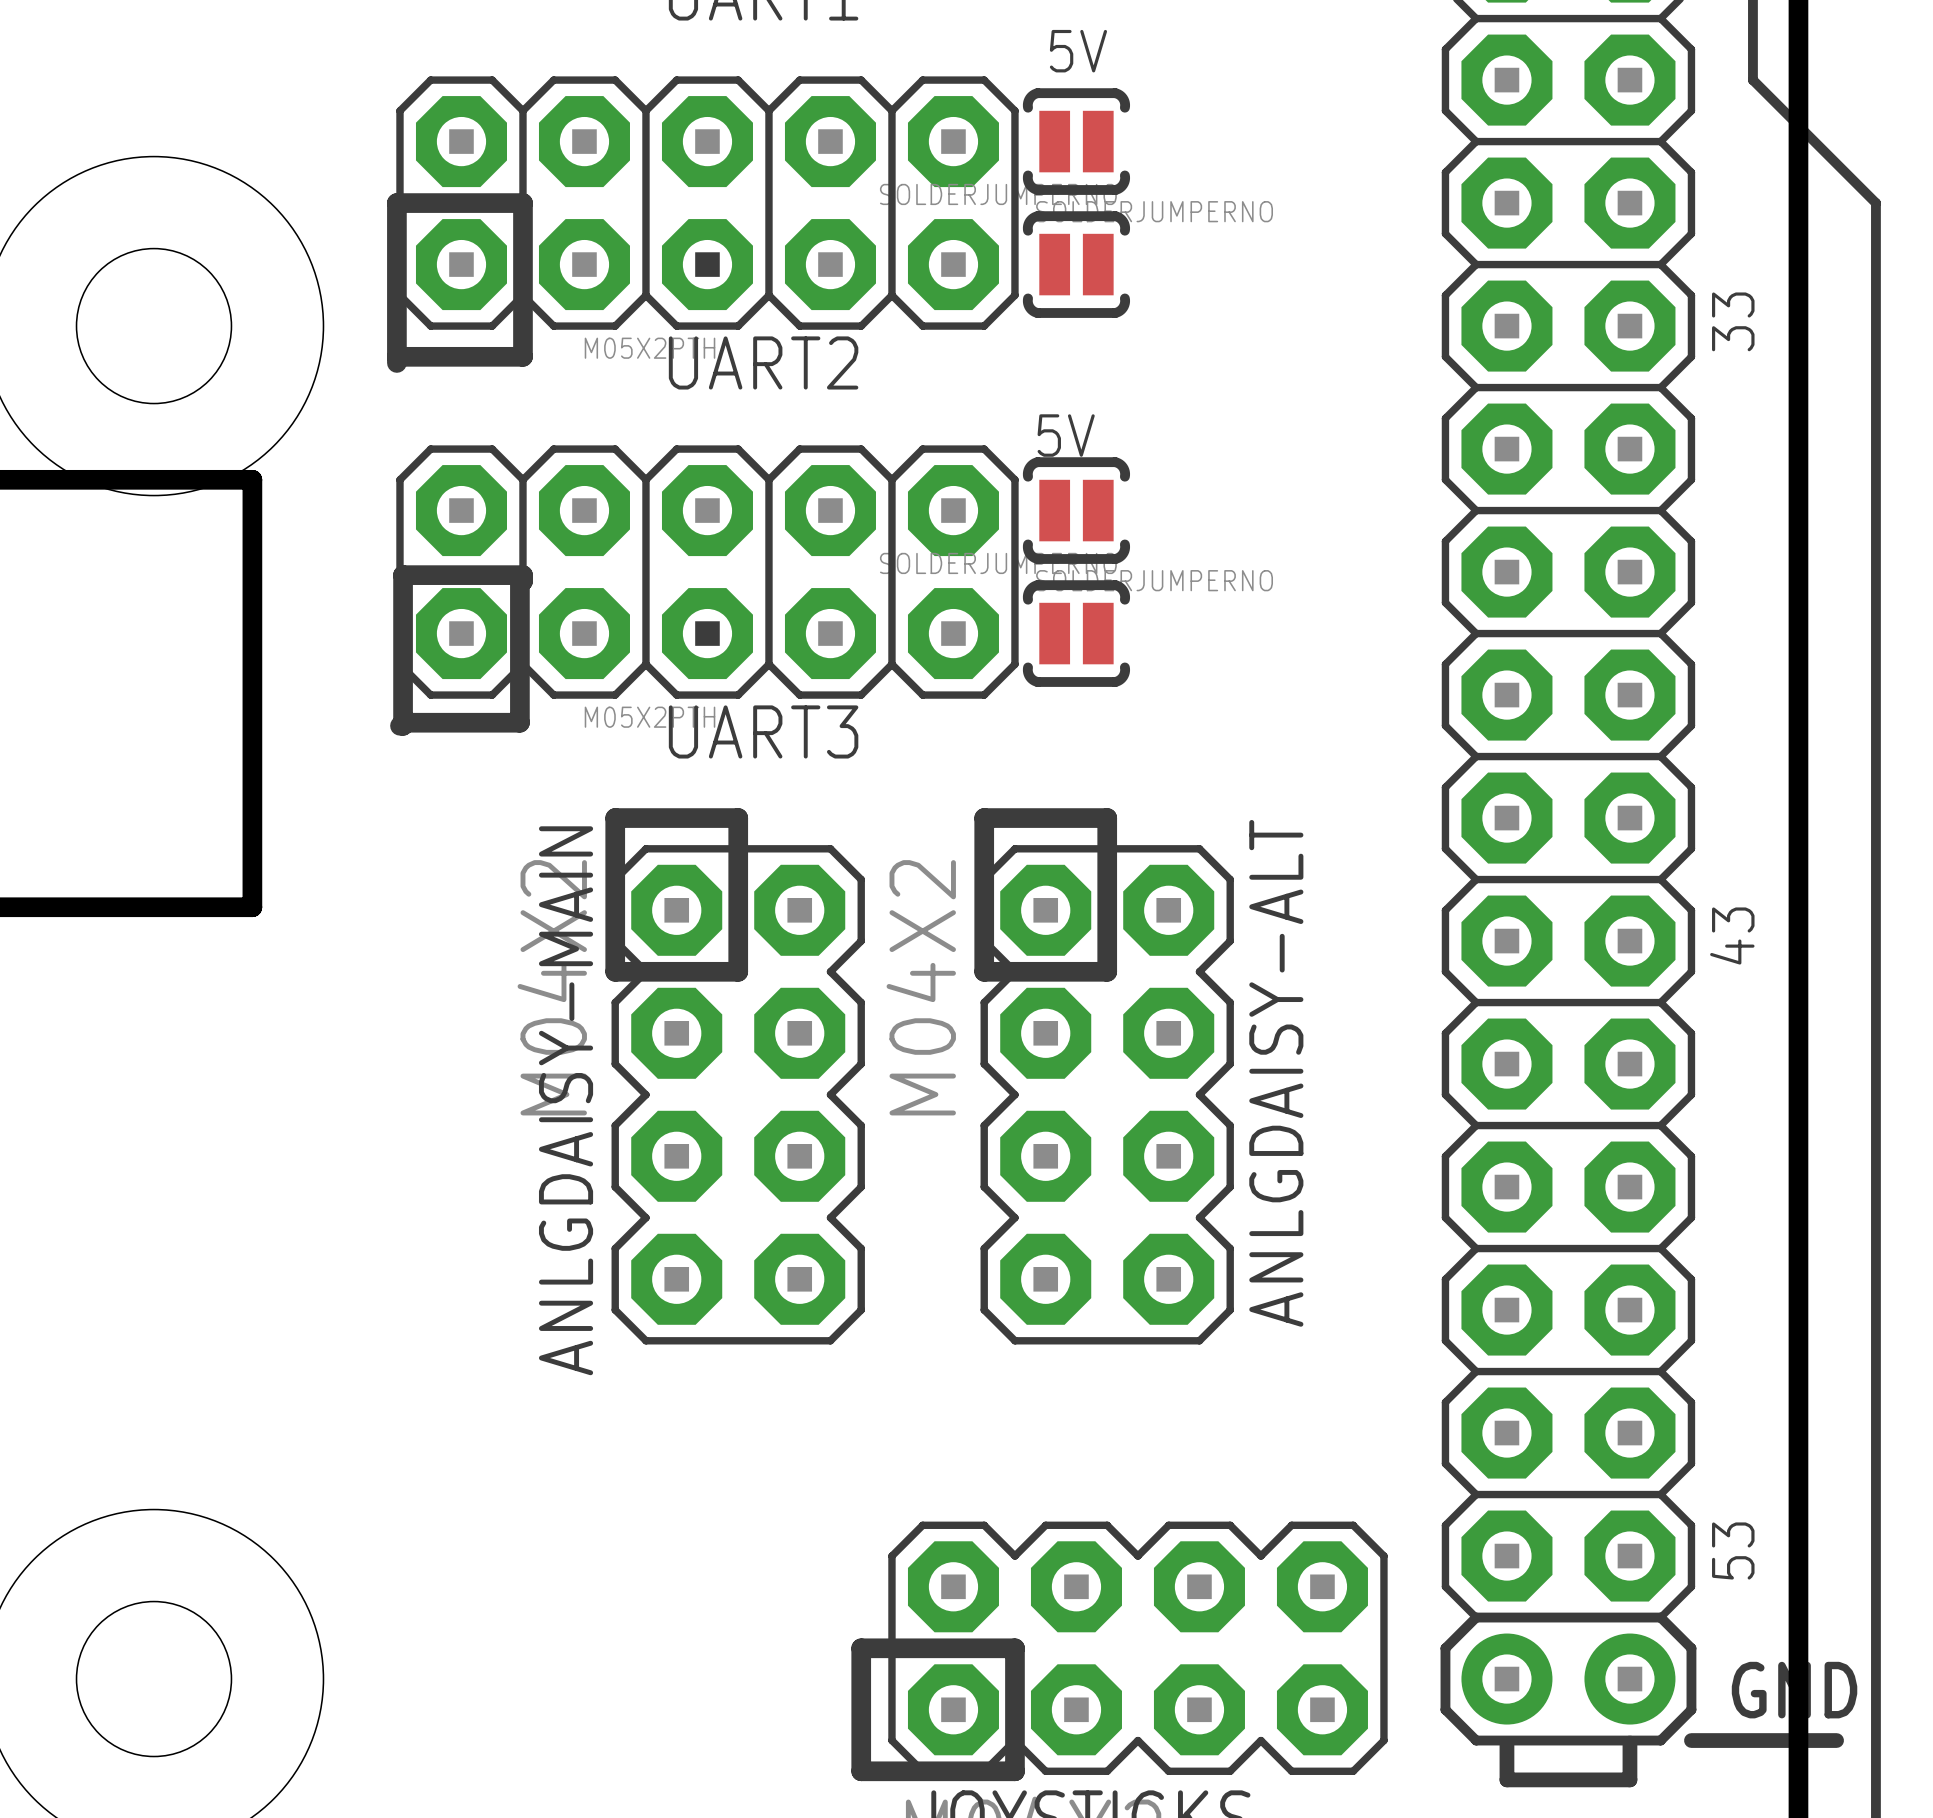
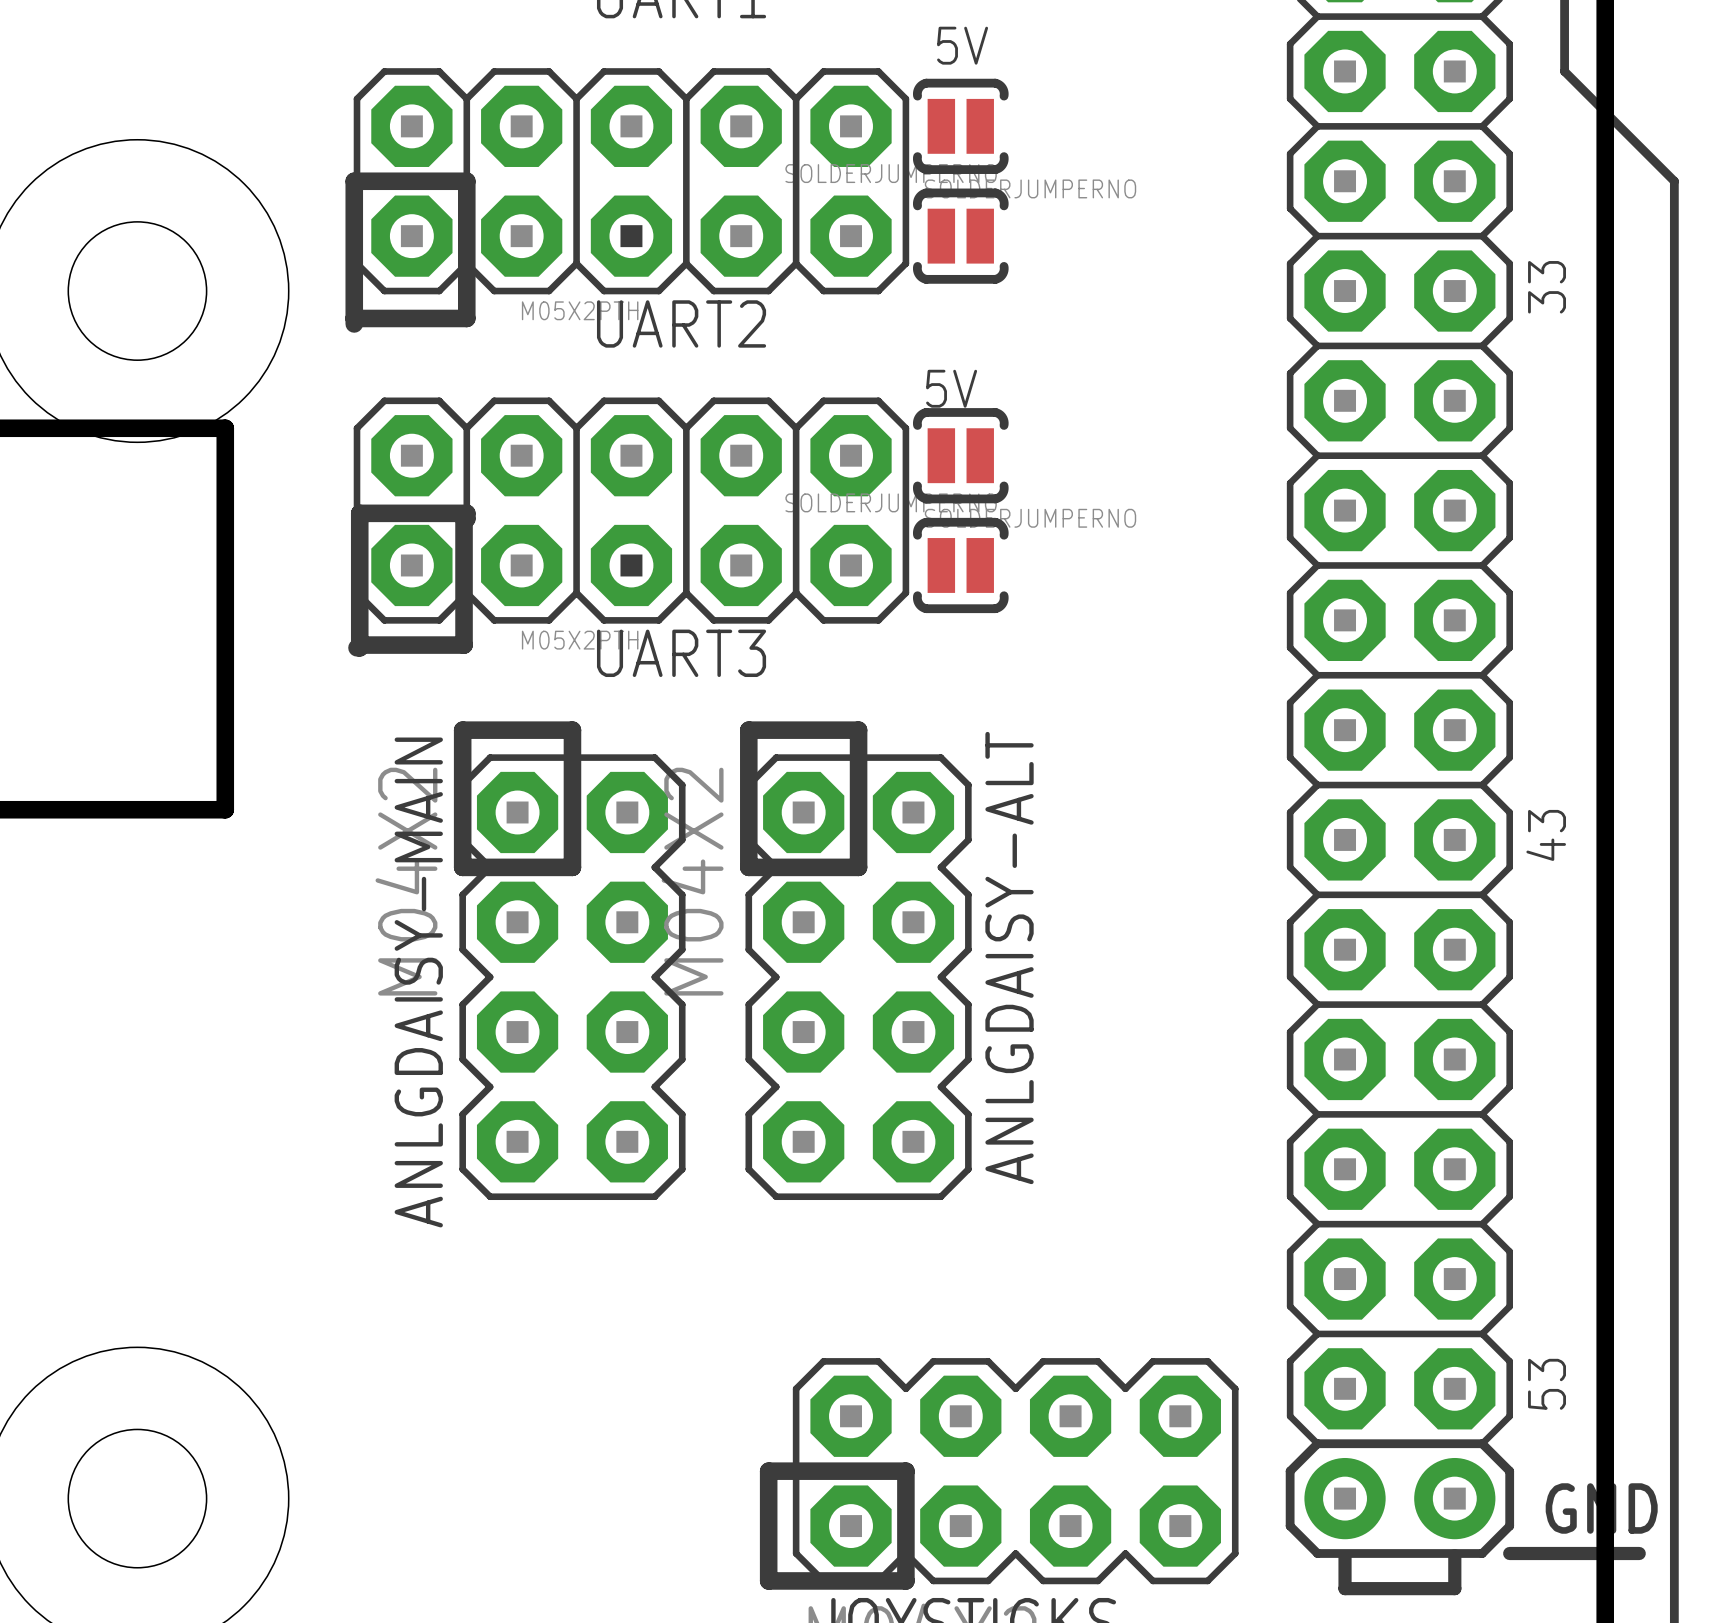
line: (615, 818) (615, 971) -> (549, 730) (462, 730) (462, 867) (549, 867)
line: (641, 818) (738, 818) (738, 971) (641, 971) -> (572, 730) (572, 867)
line: (984, 818) (1107, 818) (1107, 971) (984, 971) (984, 818) -> (748, 730) (858, 730) (858, 867) (748, 867) (748, 730)
ANLGDAISY-MAIN position: (738, 1094) -> (572, 977)
ANLGDAISY-ALT position: (1107, 1094) -> (858, 977)

